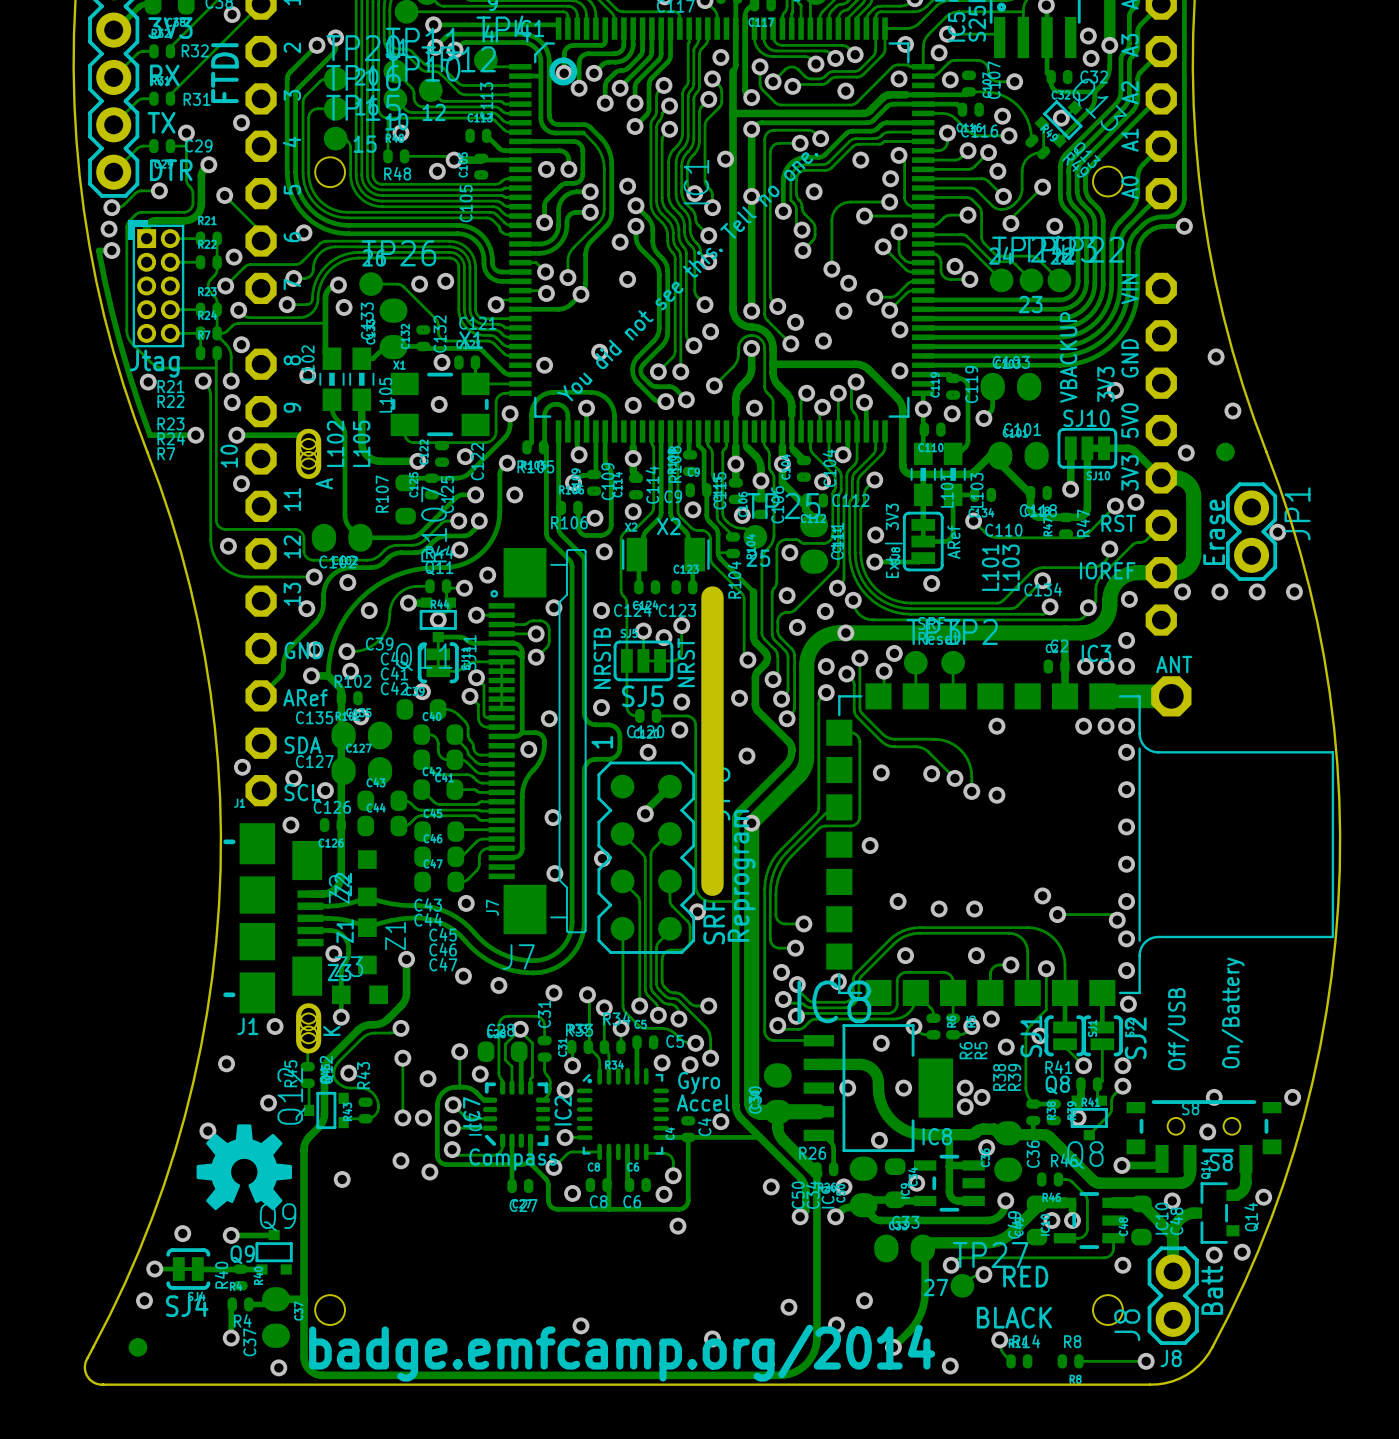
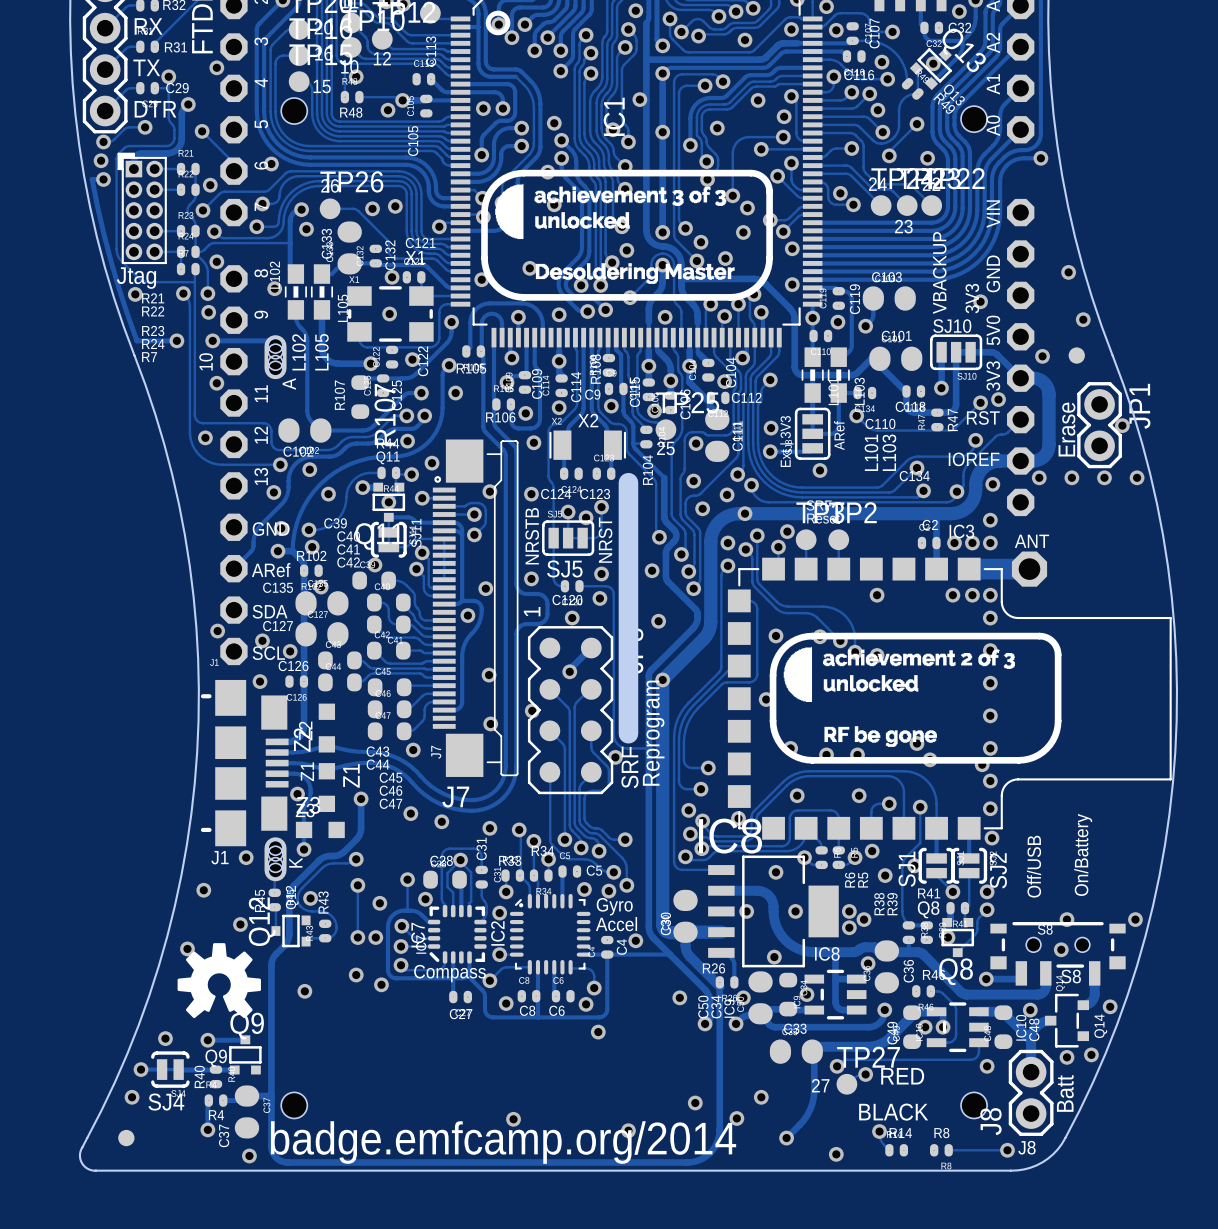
drawing: none -> [481, 169, 773, 301]
text: You did not see this. Tell no one. (687, 276) -> none
part footprint: [826, 683, 1335, 1007] -> [727, 557, 1172, 840]
drawing: none -> [769, 632, 1062, 764]

